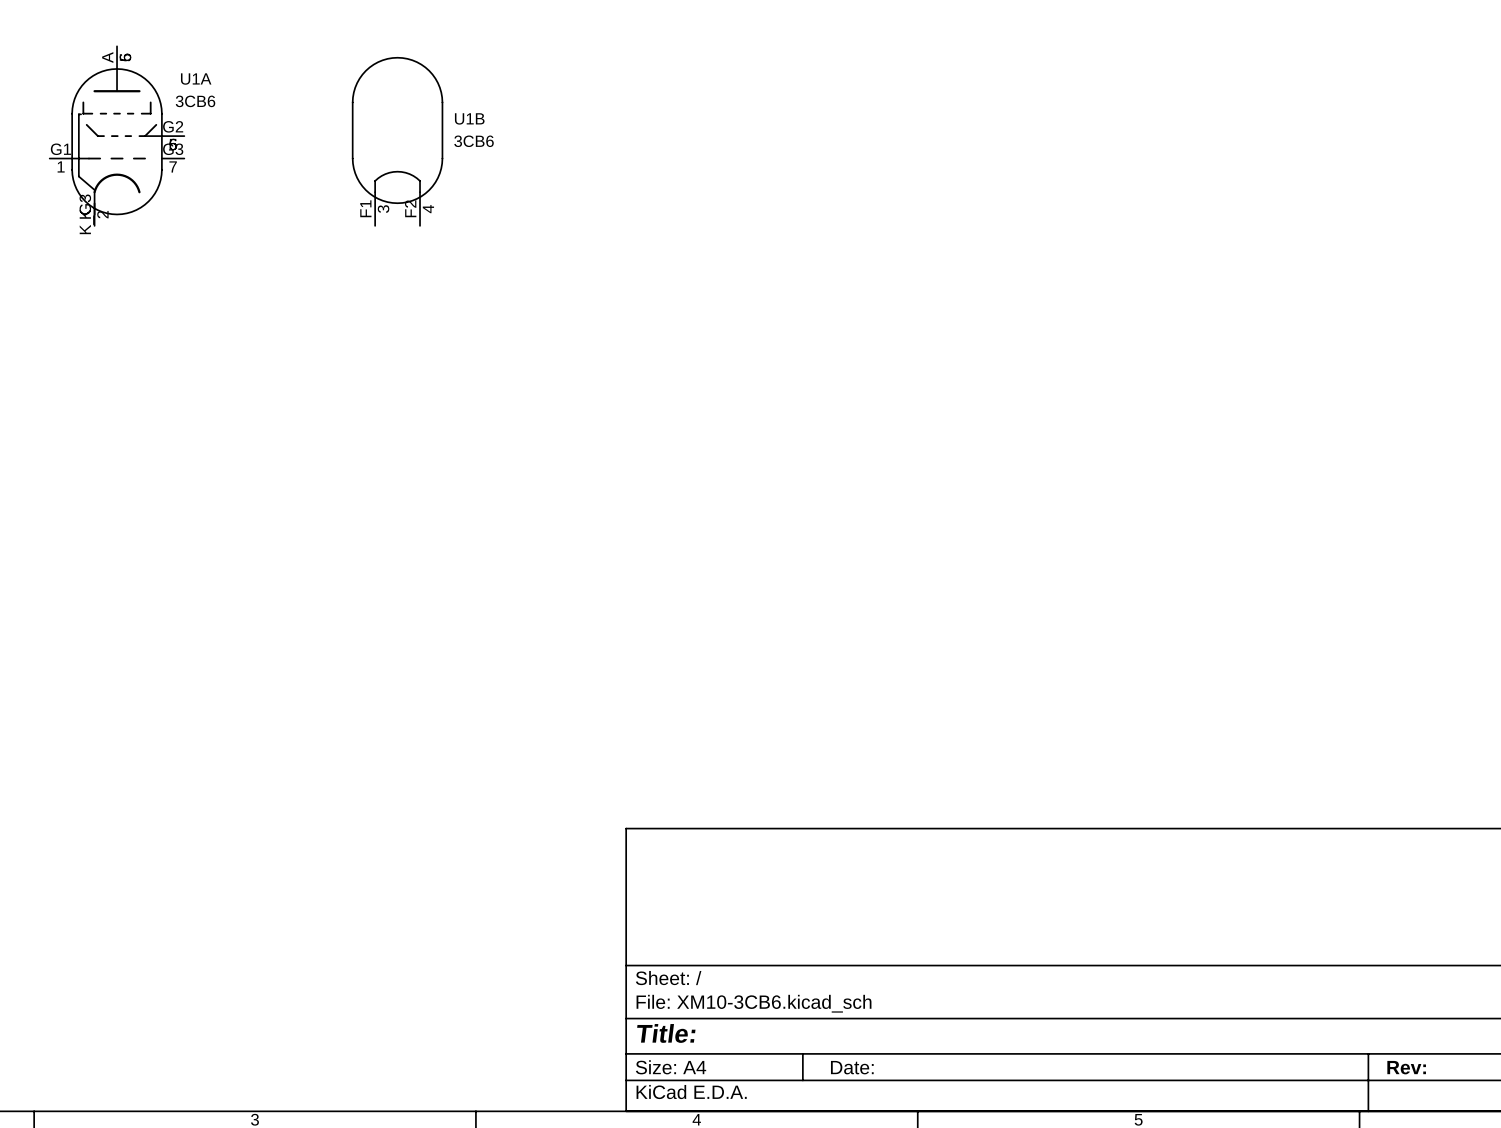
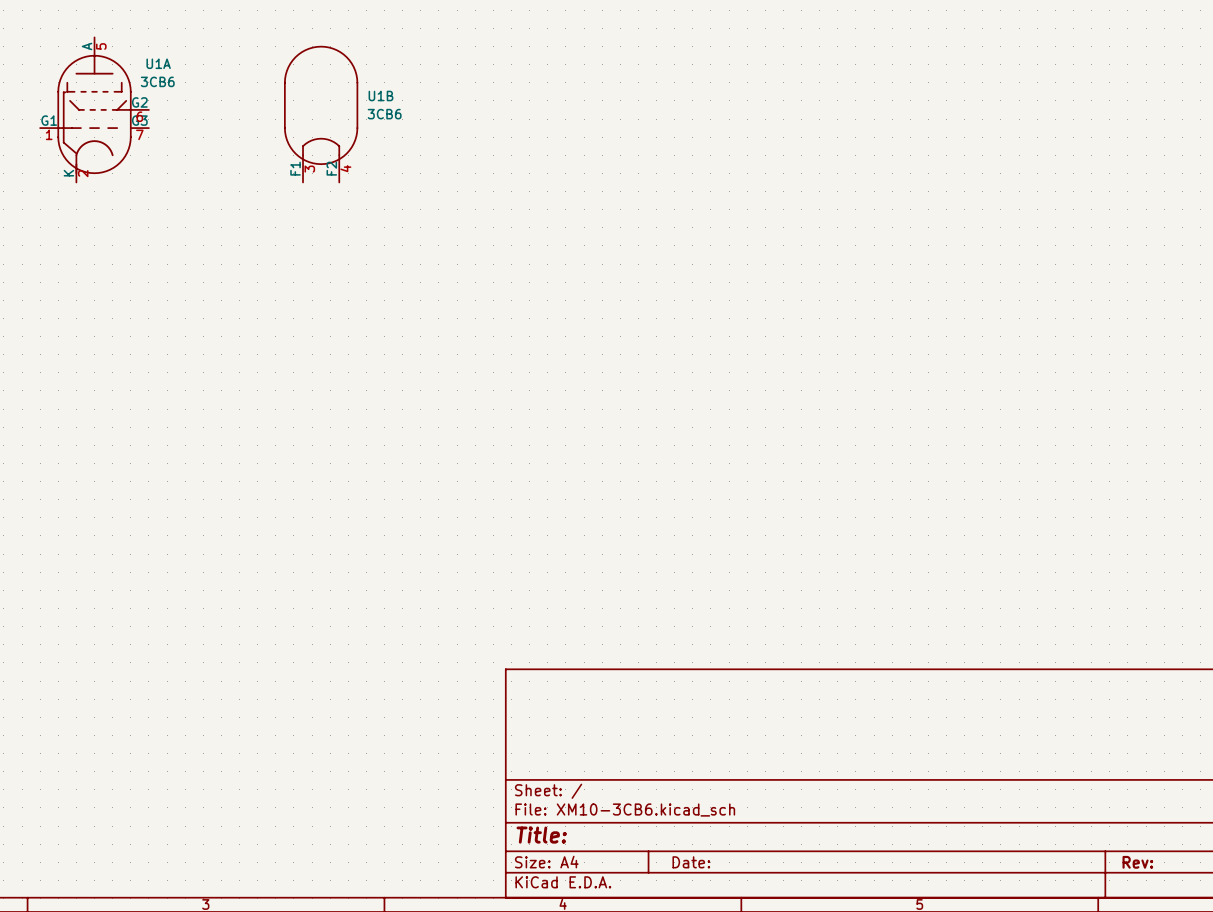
U1A symbol: [49, 46, 185, 226] -> [40, 37, 149, 183]

